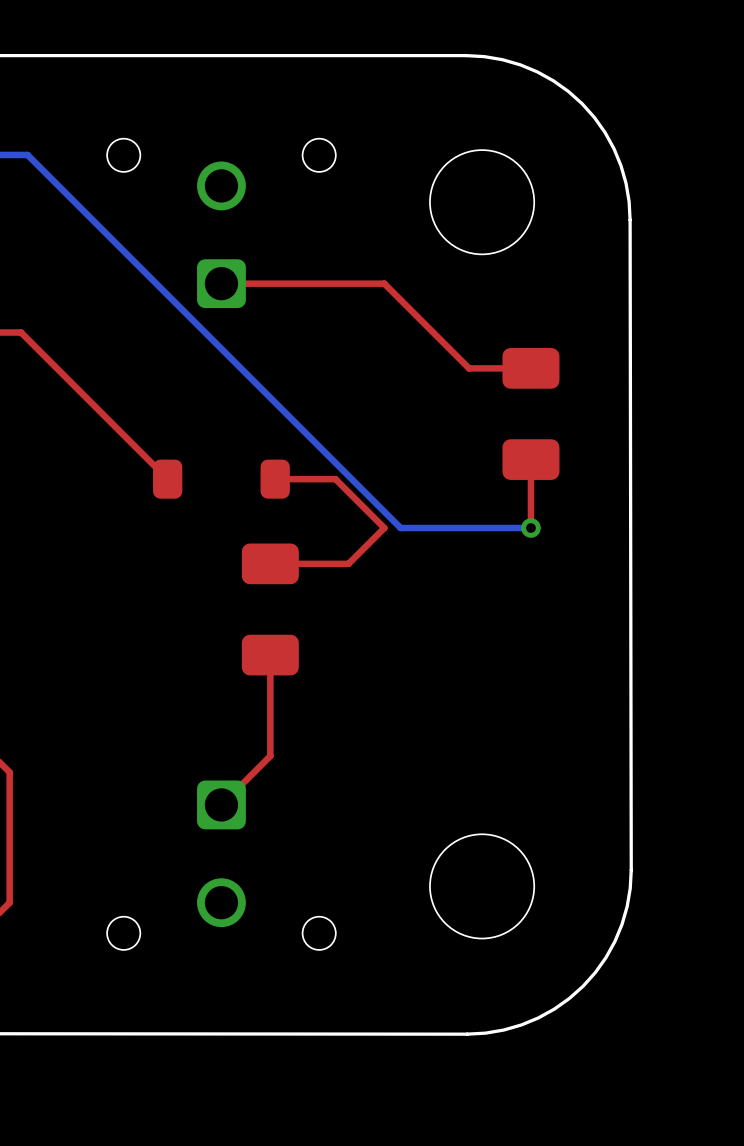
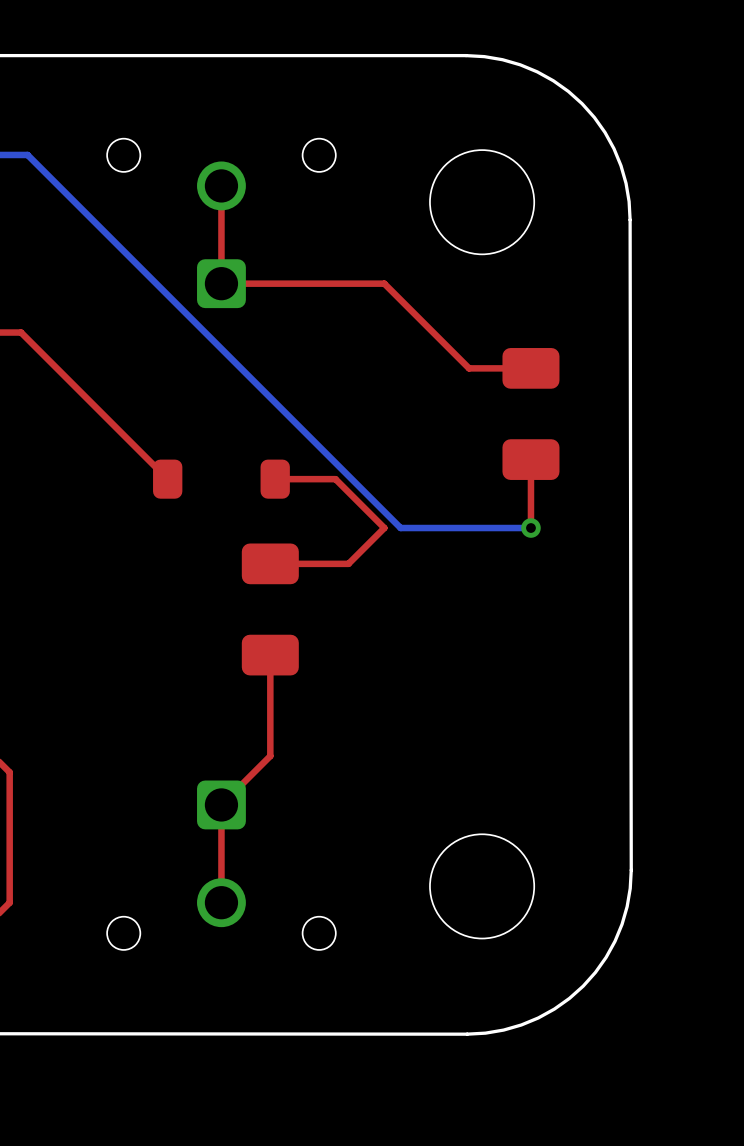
top track: none -> (221, 185) (221, 283)
top track: none -> (221, 804) (221, 902)

